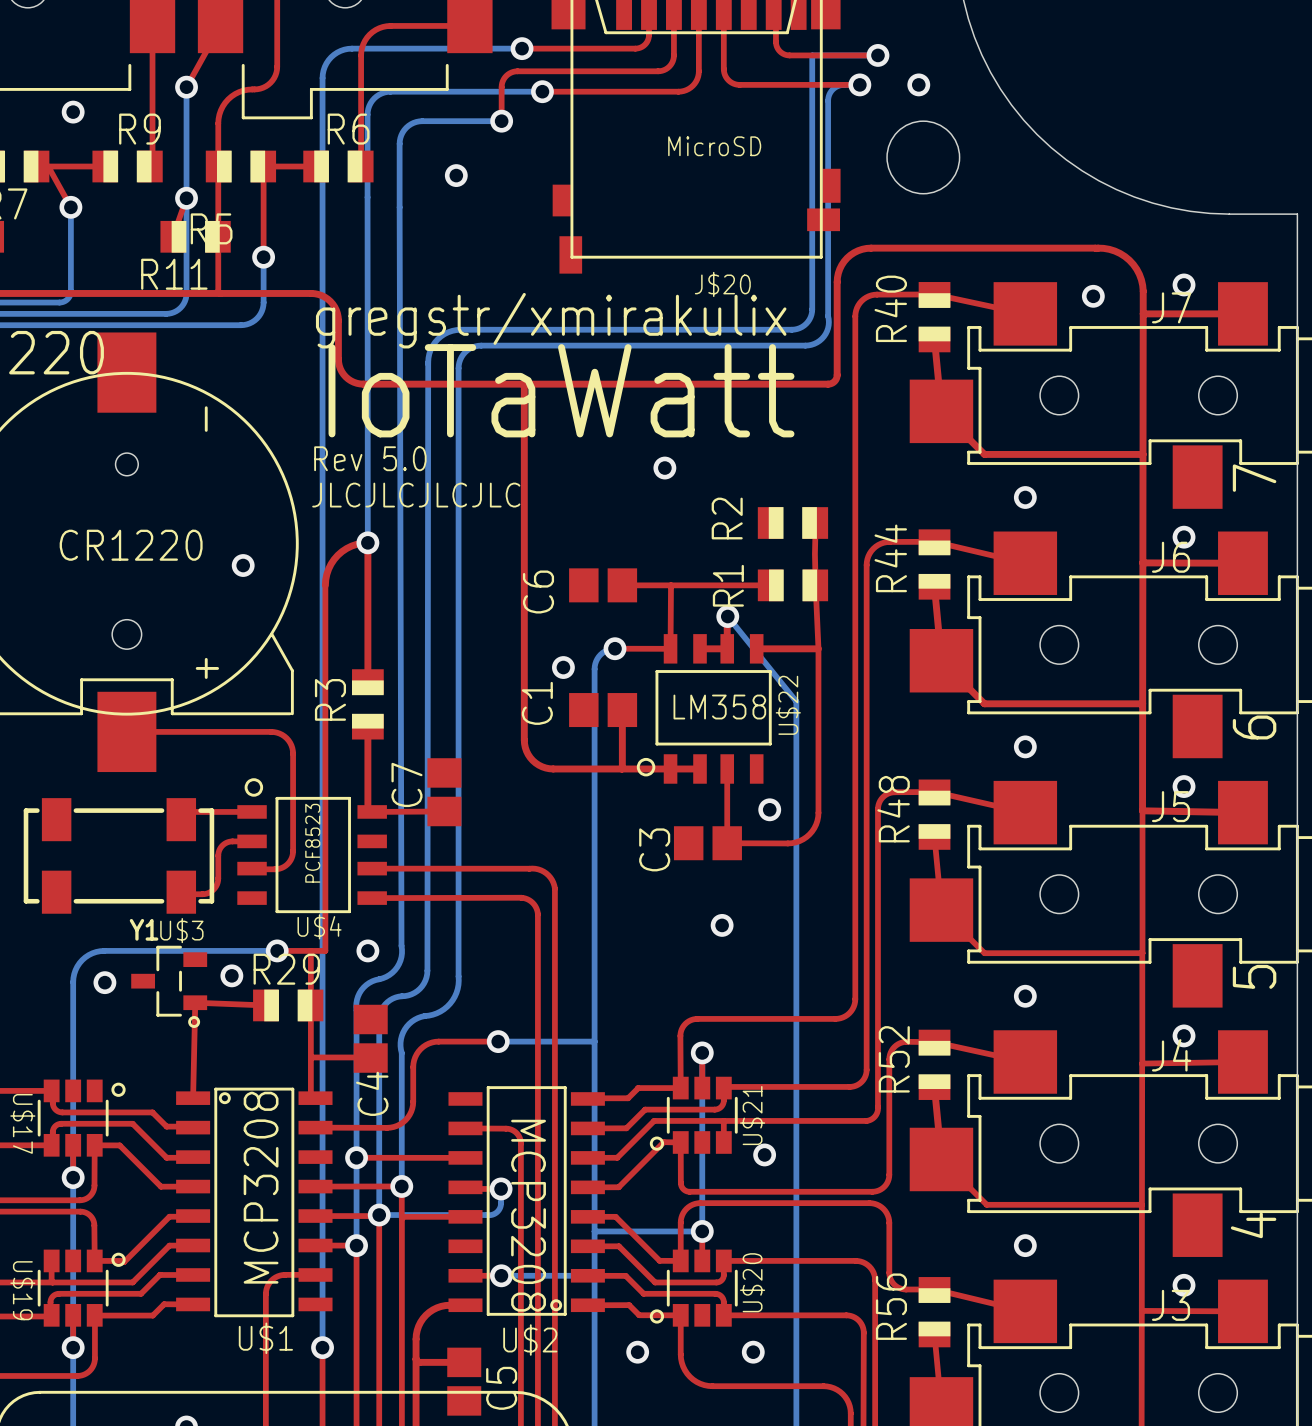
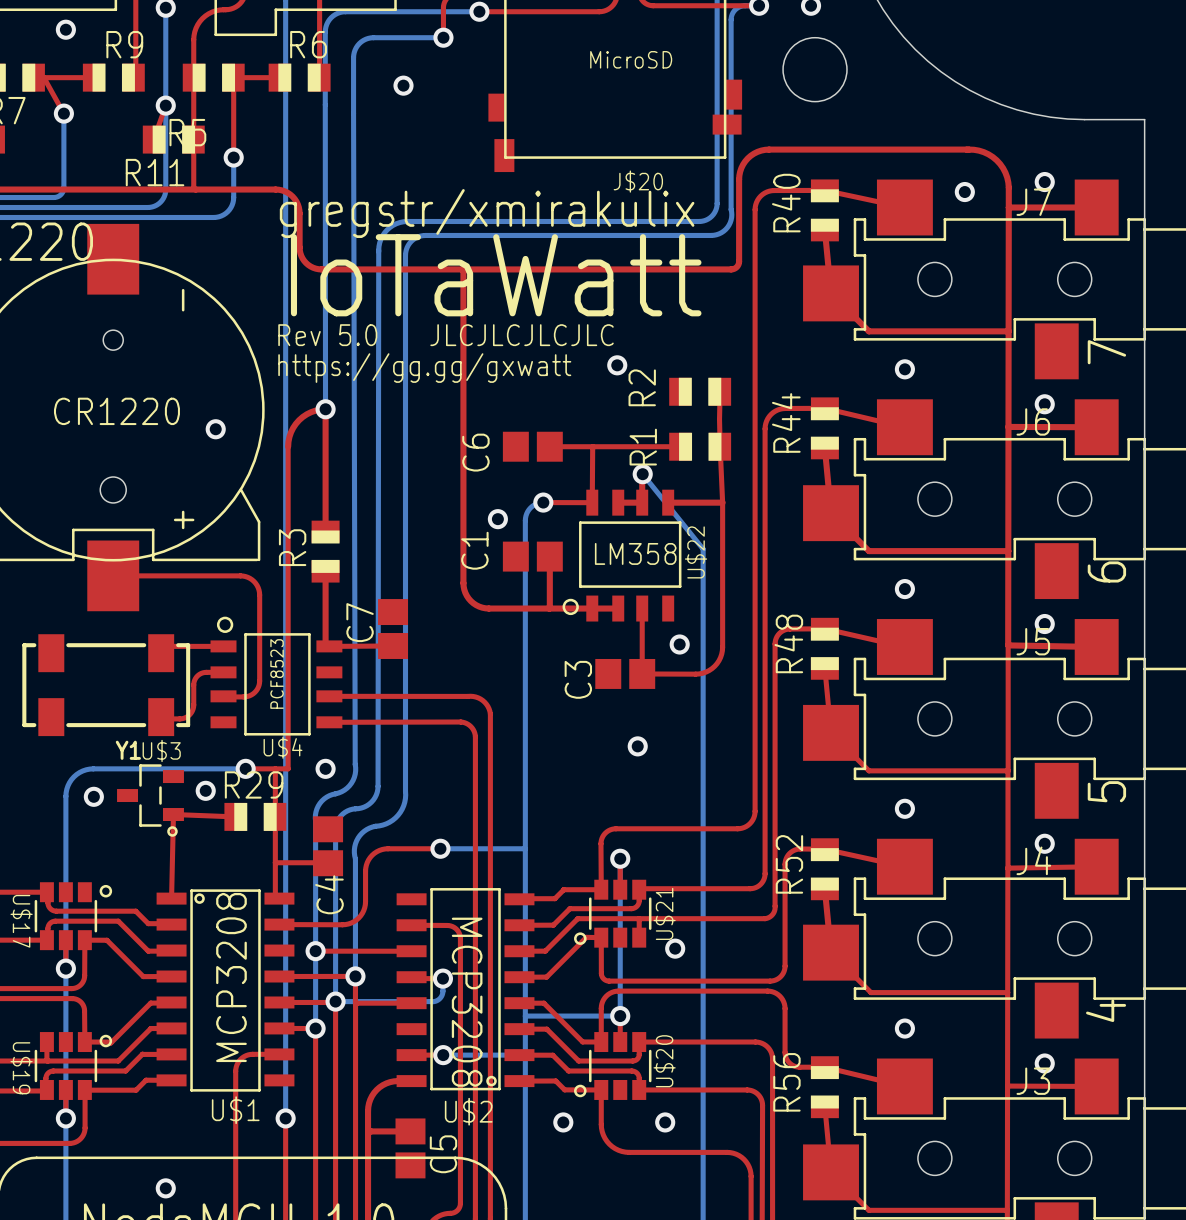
via position: (664, 468) -> (617, 365)
text position: JLCJLCJLCJLC (416, 495) -> JLCJLCJLCJLC (522, 335)
text: none -> https://gg.gg/gxwatt (424, 368)

